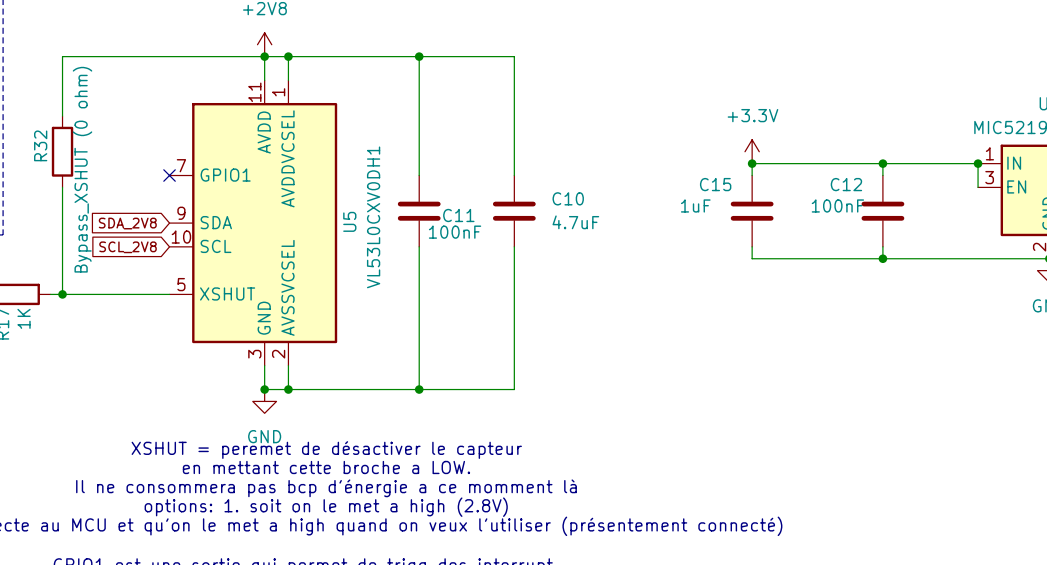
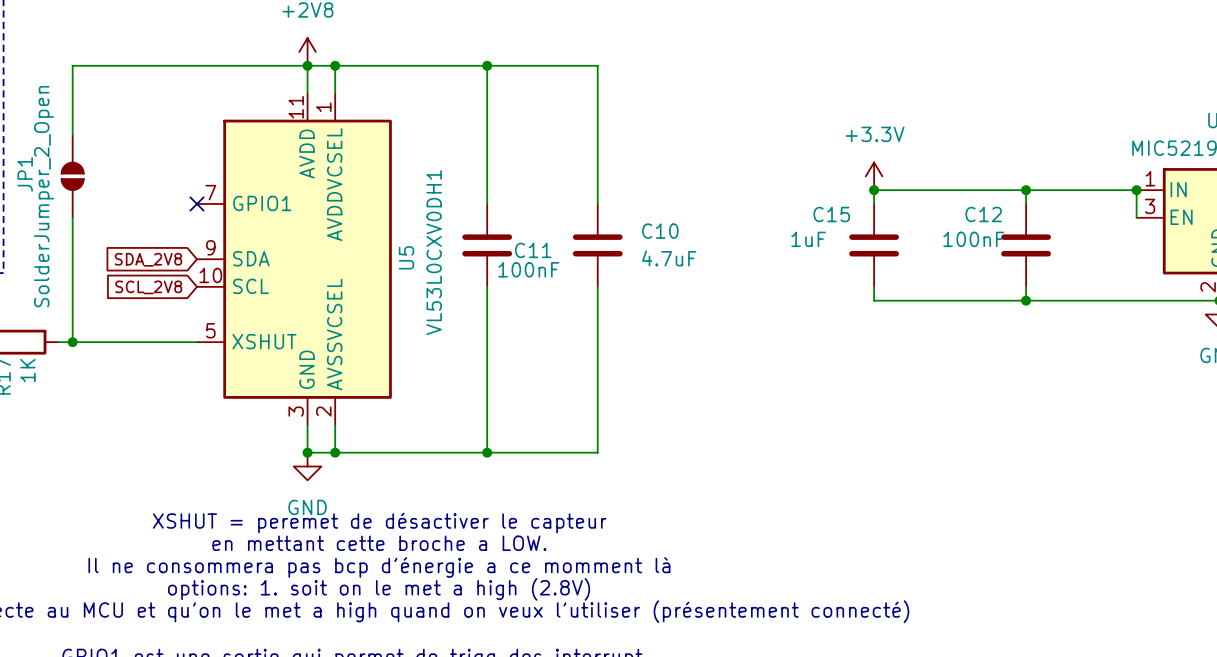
R32: Bypass_XSHUT (0 ohm) (62, 151) -> none
JP1: none -> SolderJumper_2_Open (72, 176)

